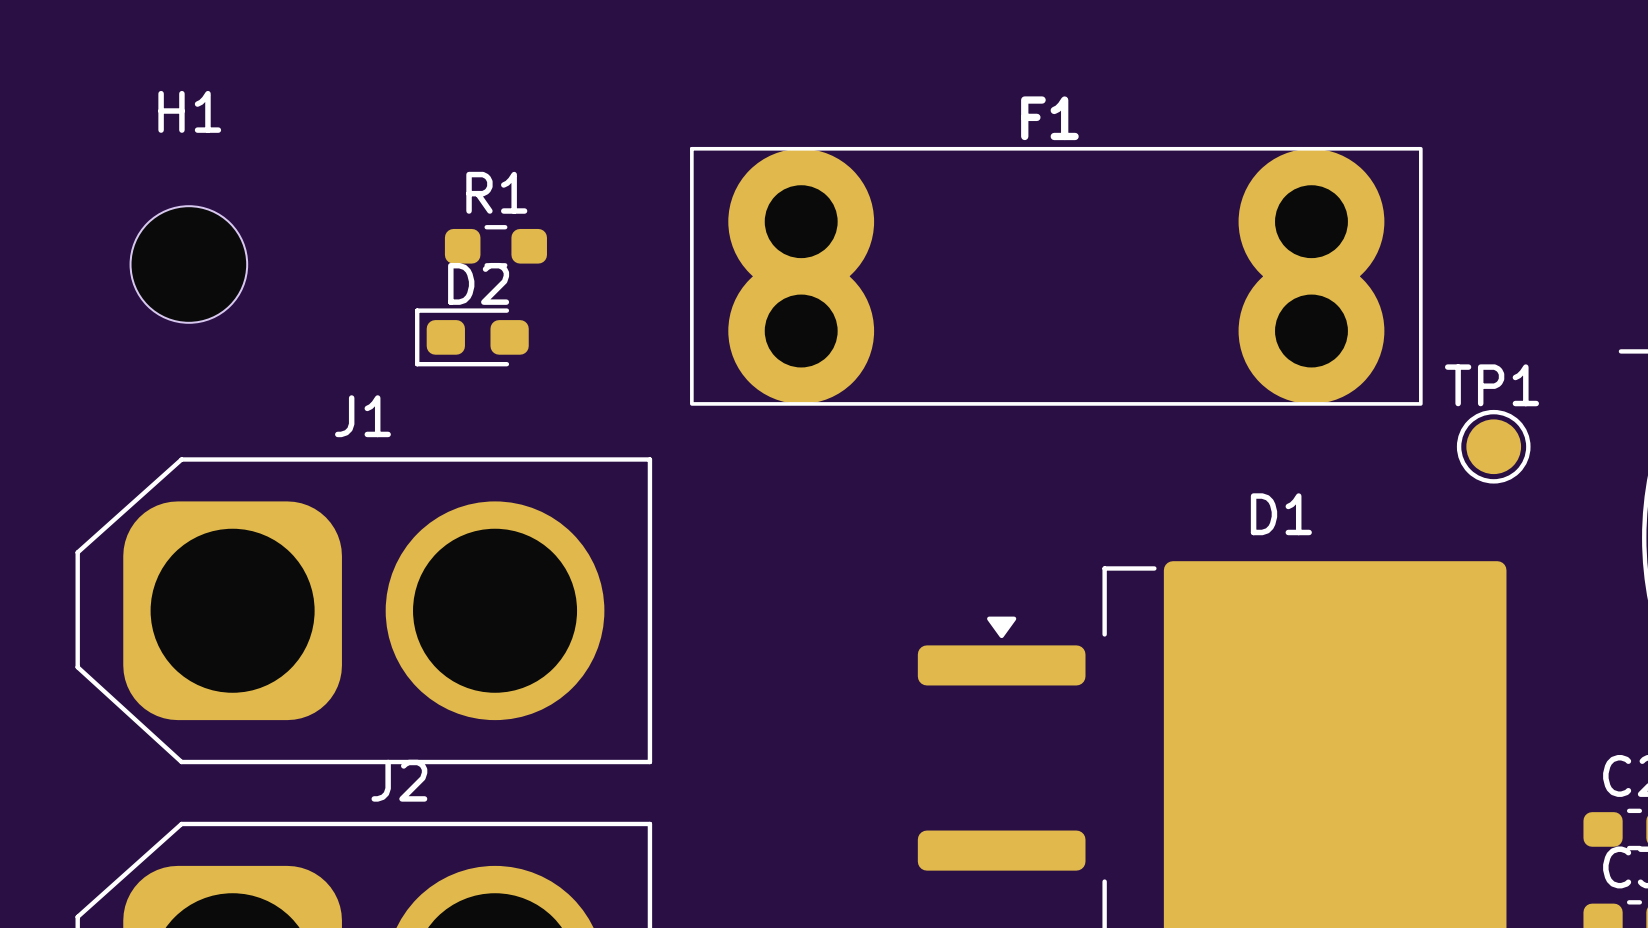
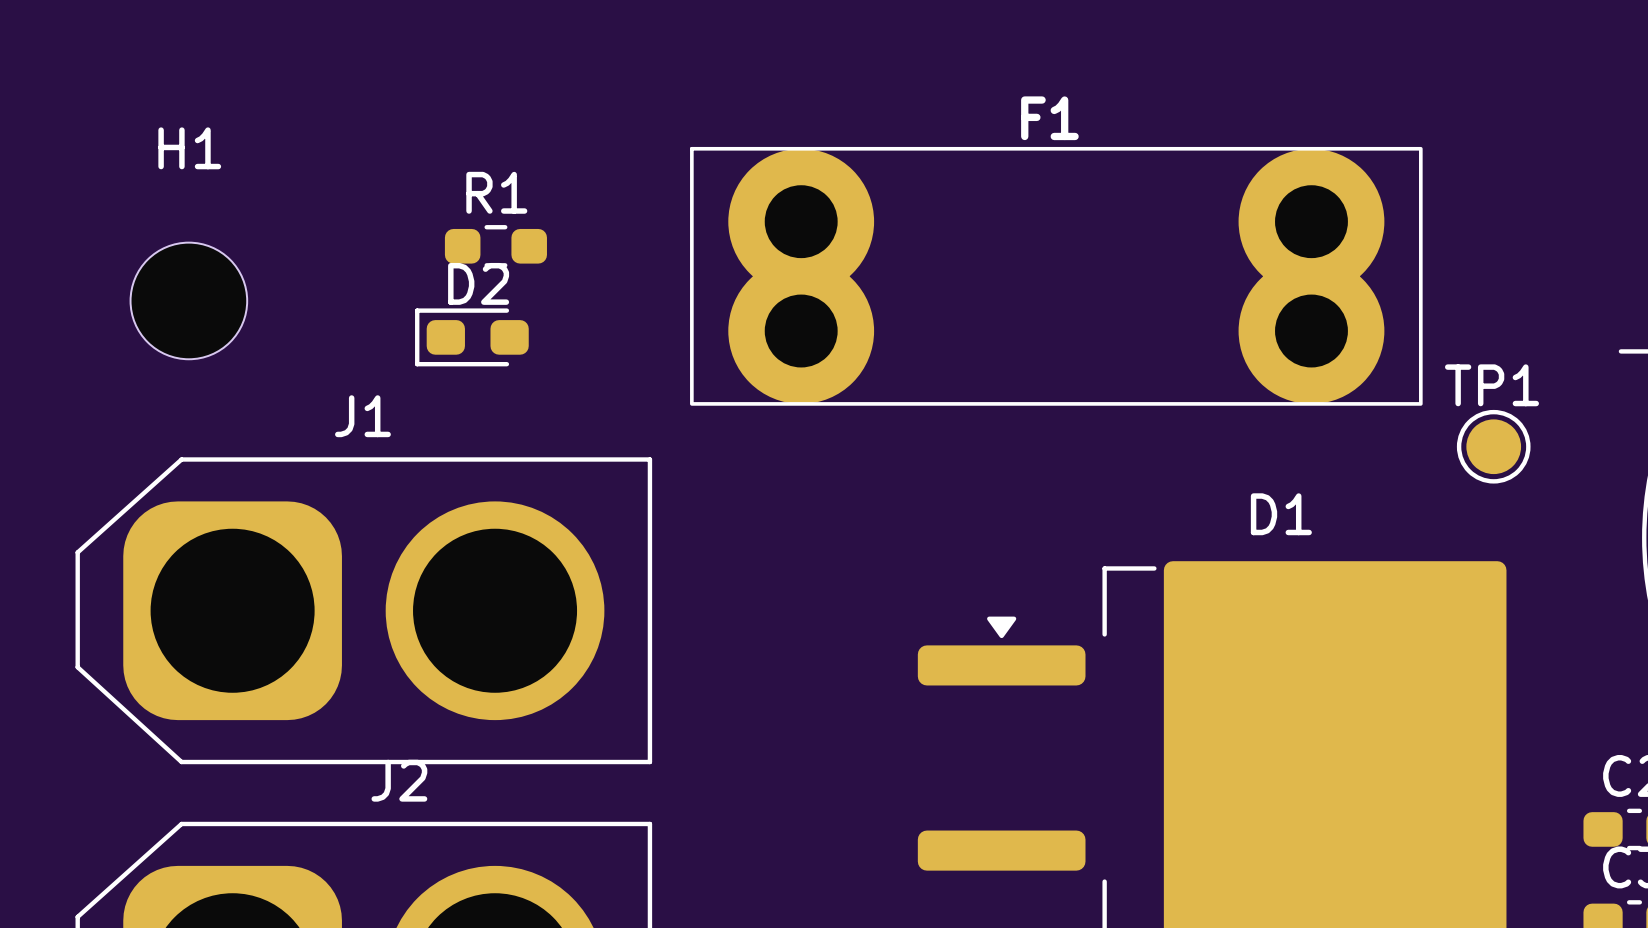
H1 position: (188, 264) -> (188, 300)

